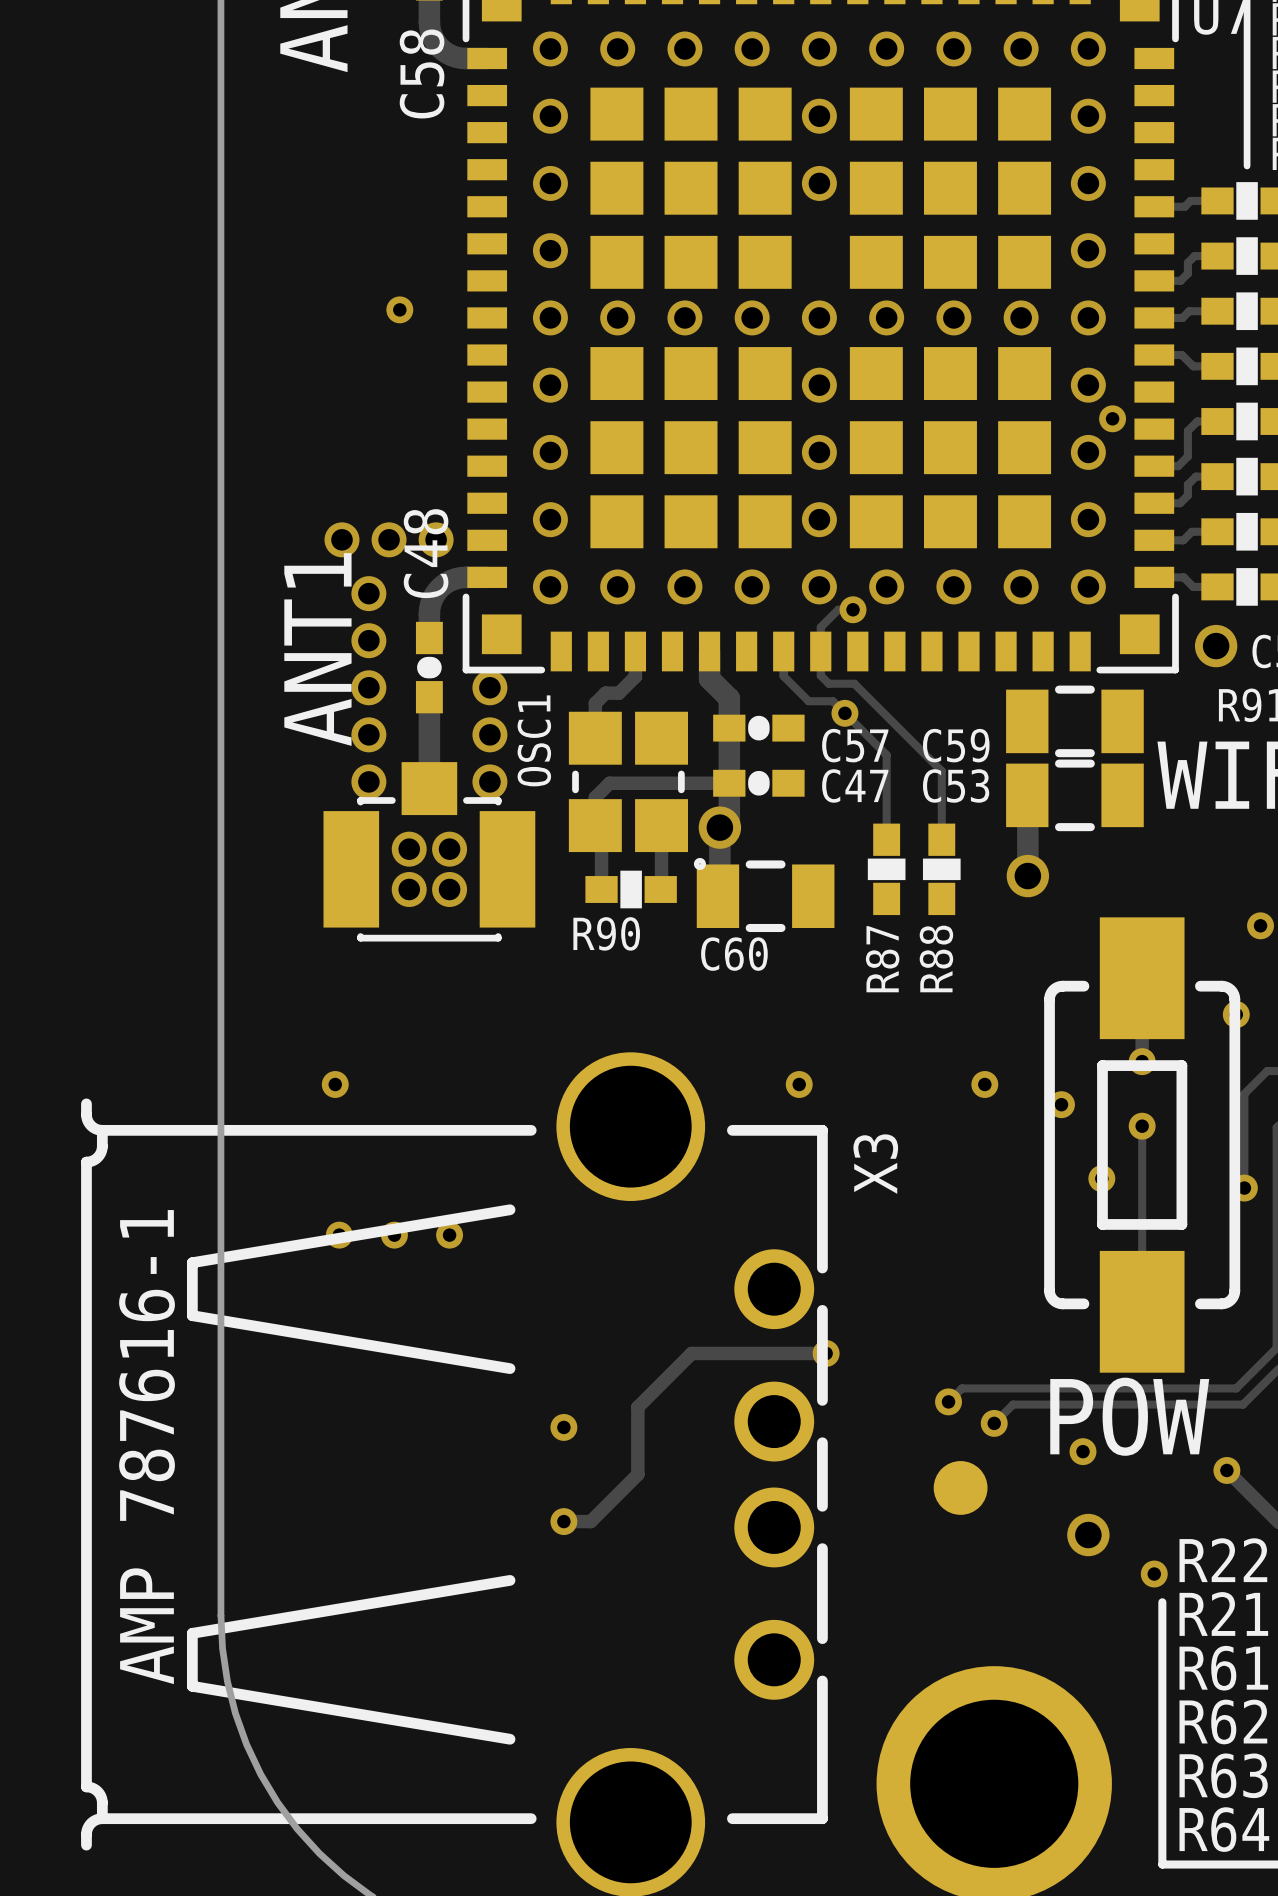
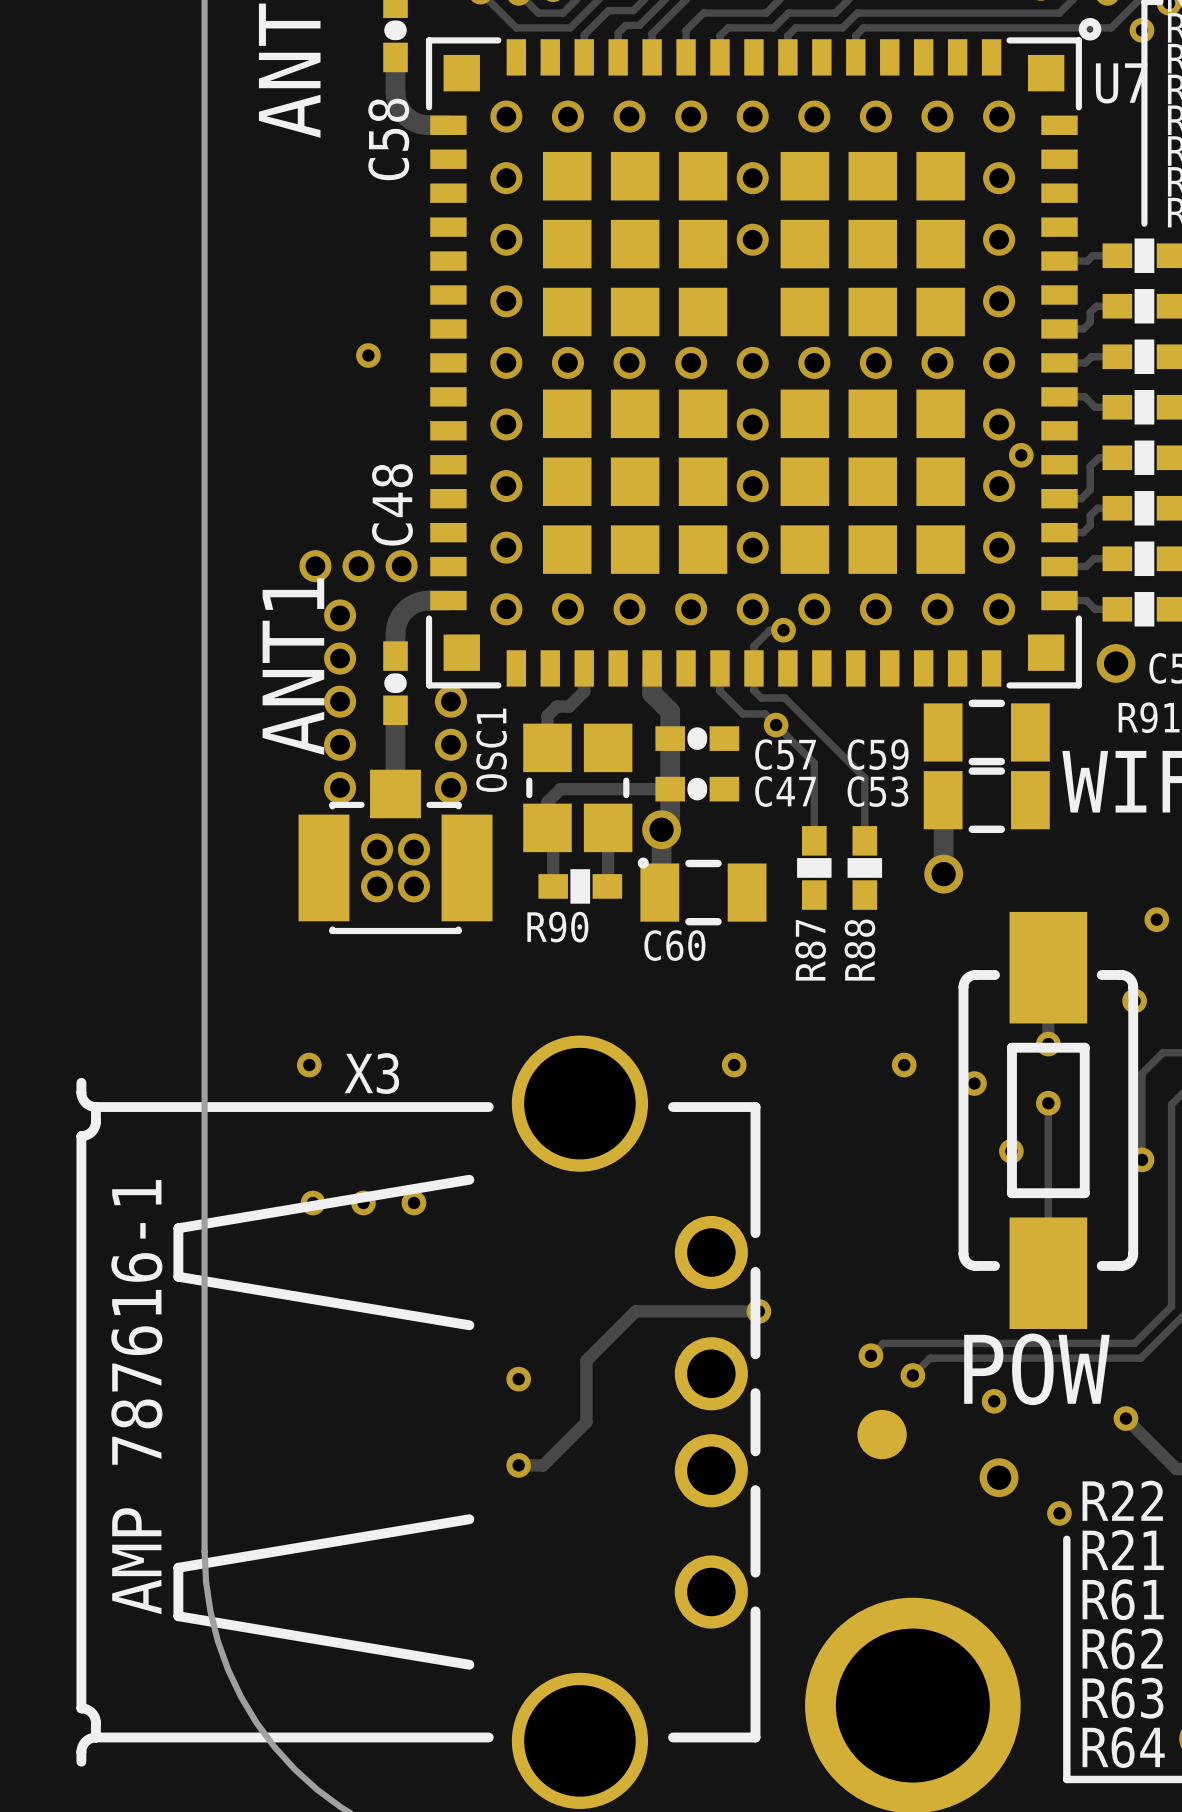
C48 name position: C48 (426, 553) -> C48 (392, 504)
X3 name rotation: 0° (875, 1164) -> 90° clockwise (371, 1073)
X3 name position: X3 (875, 1164) -> X3 (371, 1073)

